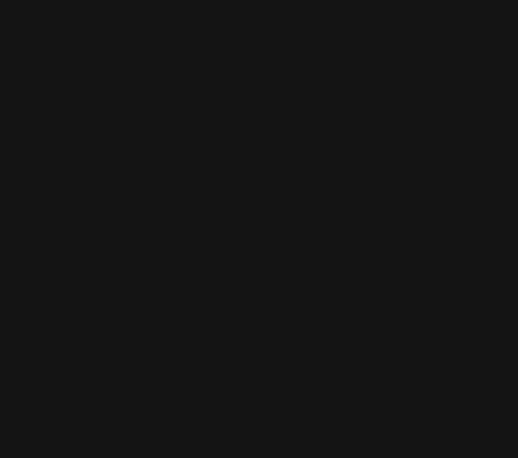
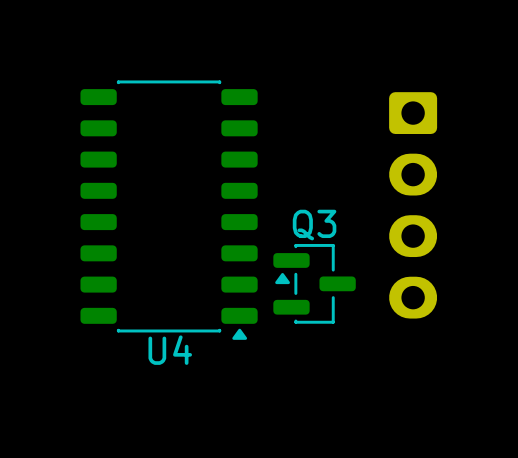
part: none -> (413, 205)
U4: none -> (169, 210)
Q3: none -> (314, 283)

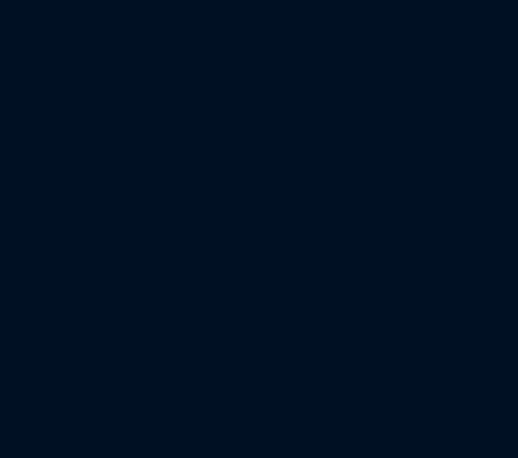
part: (413, 205) -> none
U4: (169, 210) -> none
Q3: (314, 283) -> none

